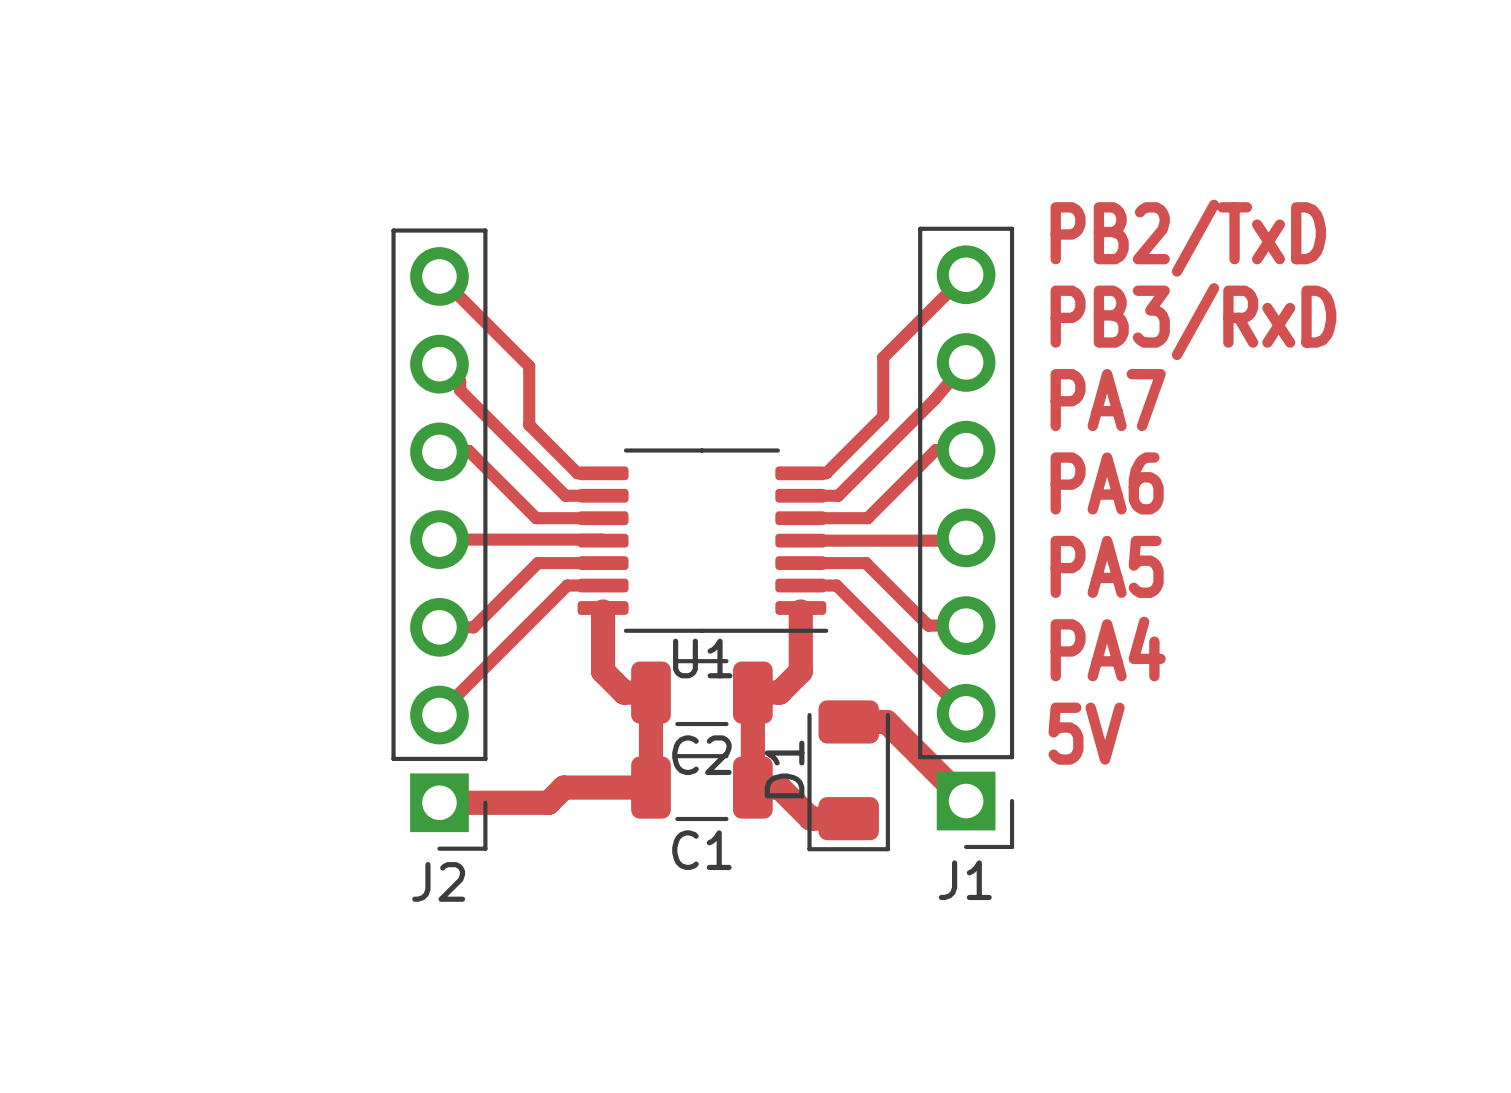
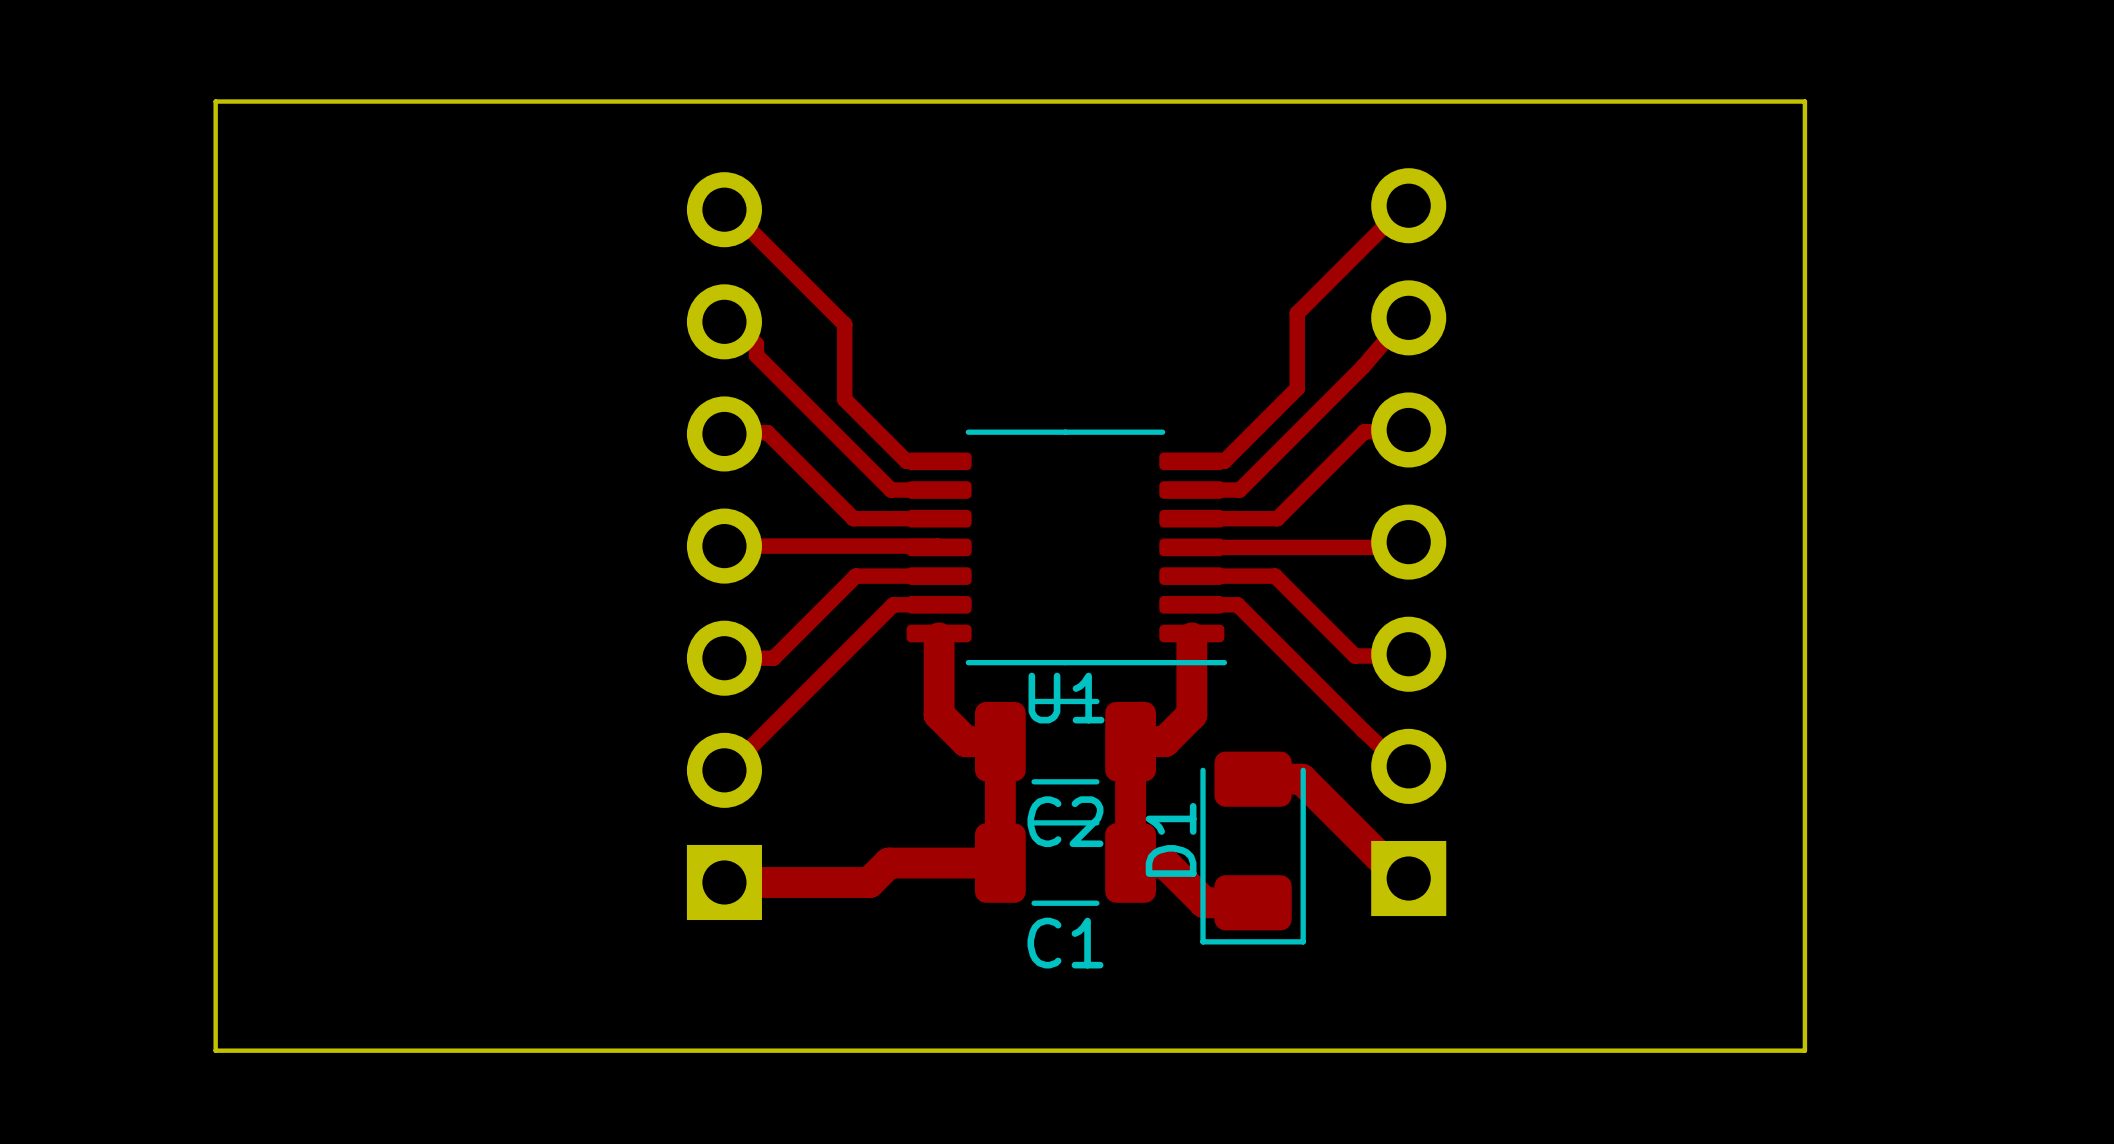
board edge: none -> (215, 101) (1804, 101) (1804, 1050) (215, 1050) (215, 101)
text: PB2/TxD (1188, 238) -> none
text: PB3/RxD (1193, 321) -> none
text: PA7 (1108, 400) -> none
text: PA6 (1107, 483) -> none
J1 side: top (966, 537) -> bottom (1408, 542)
J2 side: top (439, 539) -> bottom (724, 546)
text: PA5 (1107, 566) -> none
text: PA4 (1108, 649) -> none
text: 5V (1086, 733) -> none

